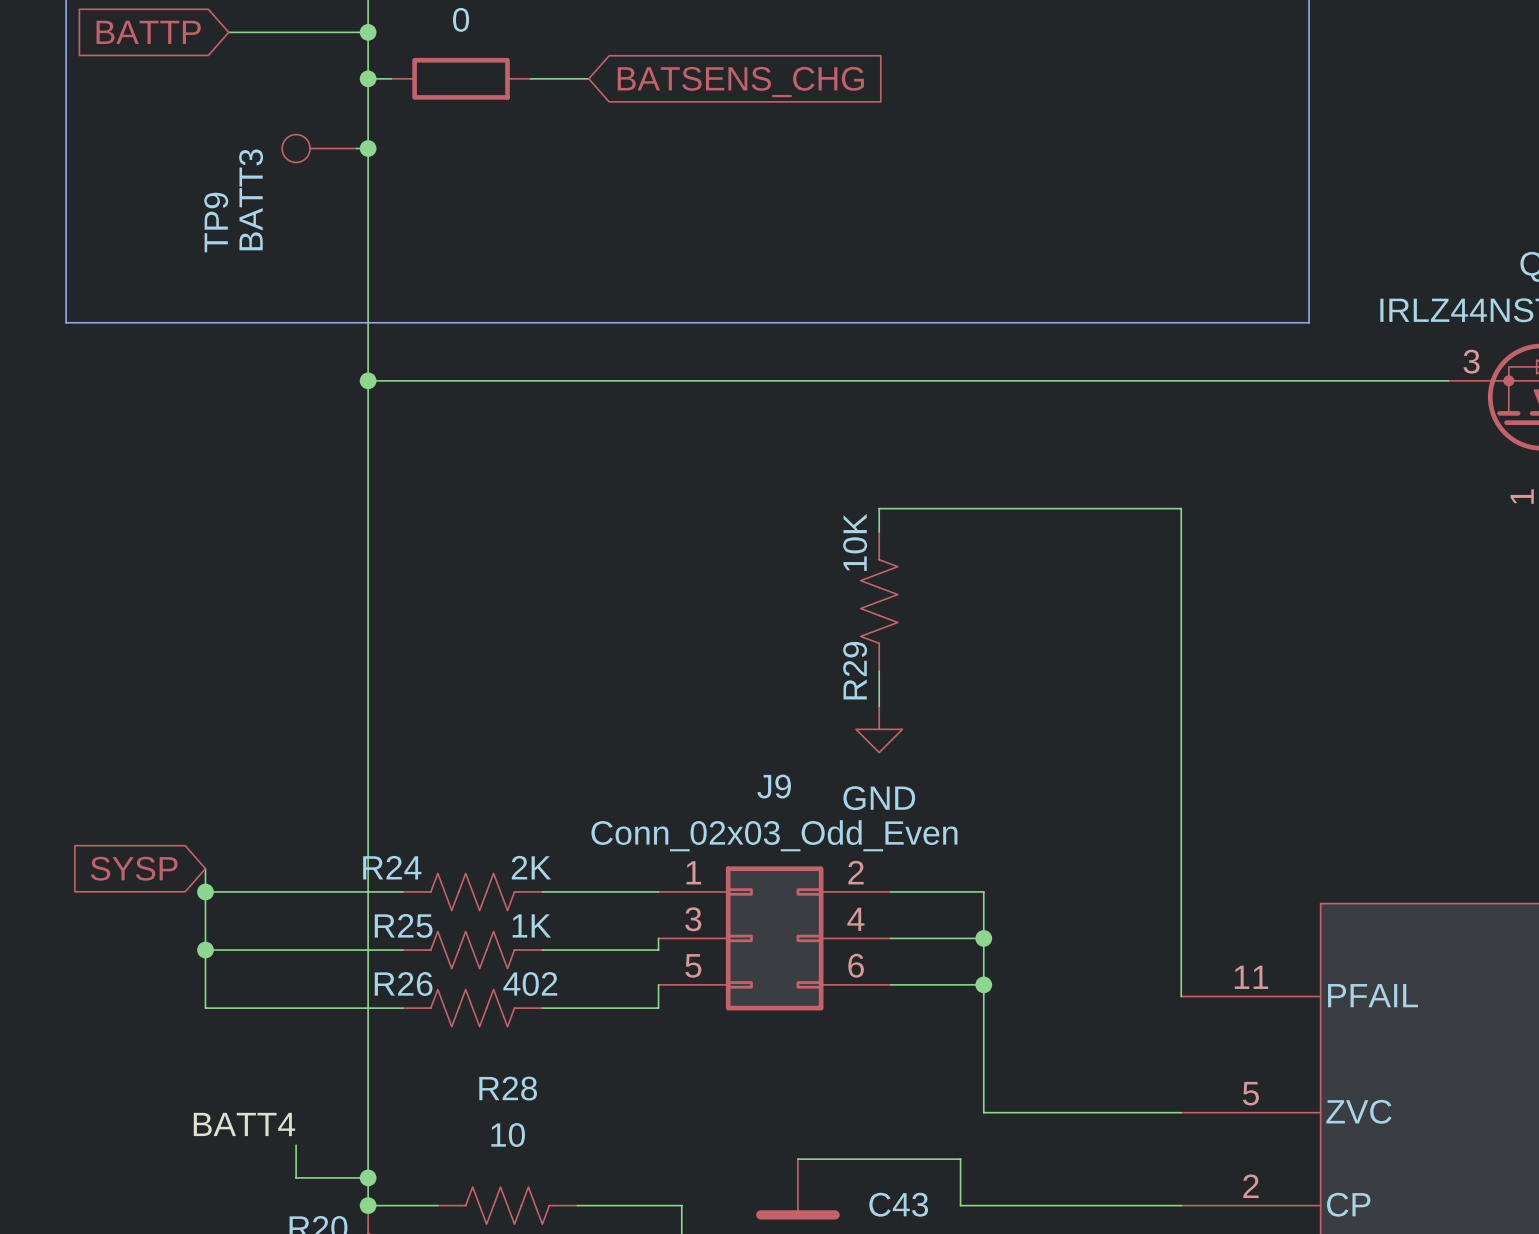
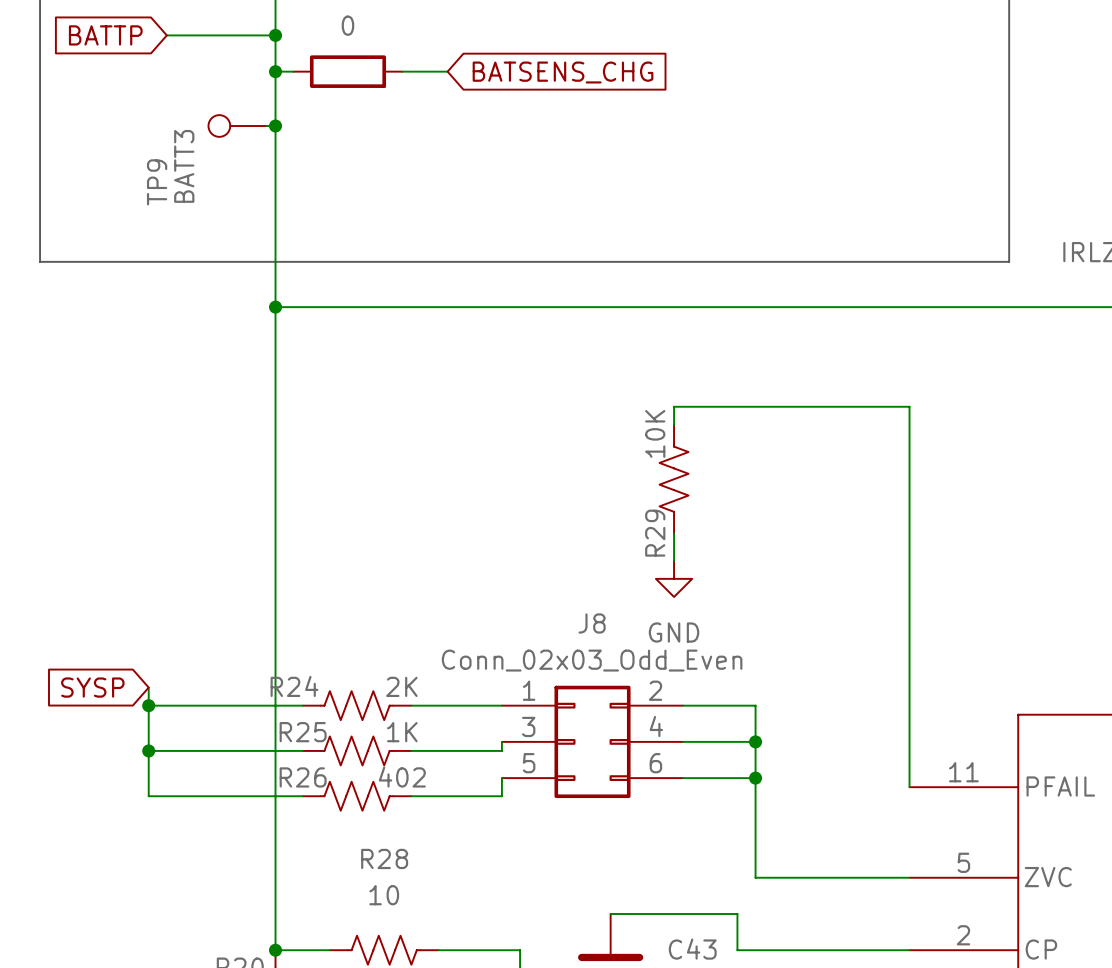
J9 name: J9 (774, 786) -> J8 (592, 623)
label: BATT4 (244, 1124) -> none
wire: (296, 1145) (296, 1177) (368, 1177) -> none
junction: (368, 1177) -> none

